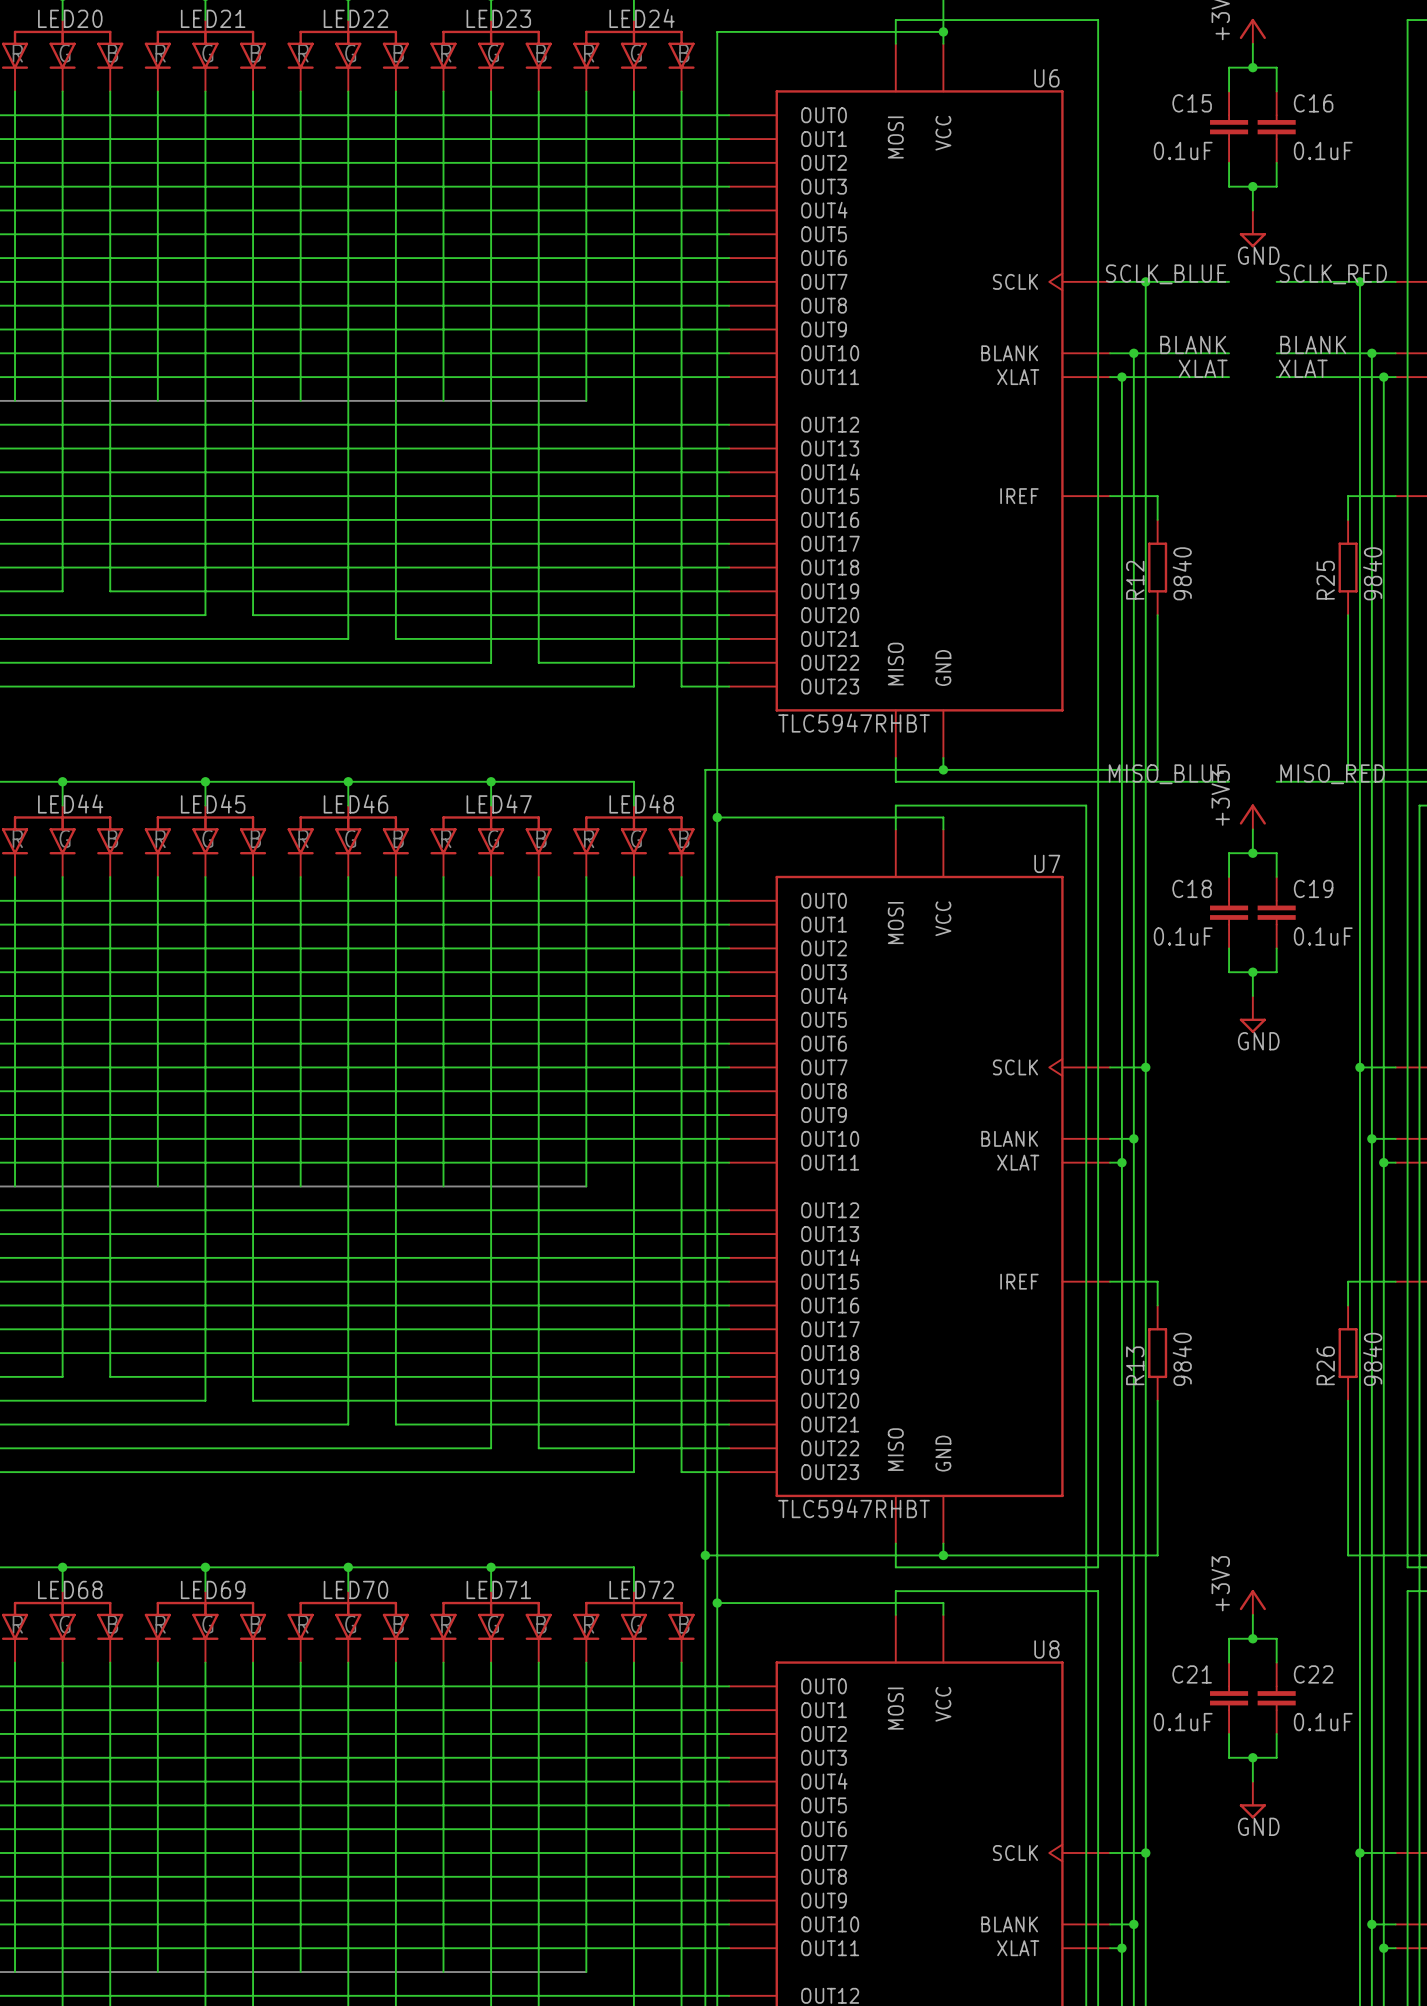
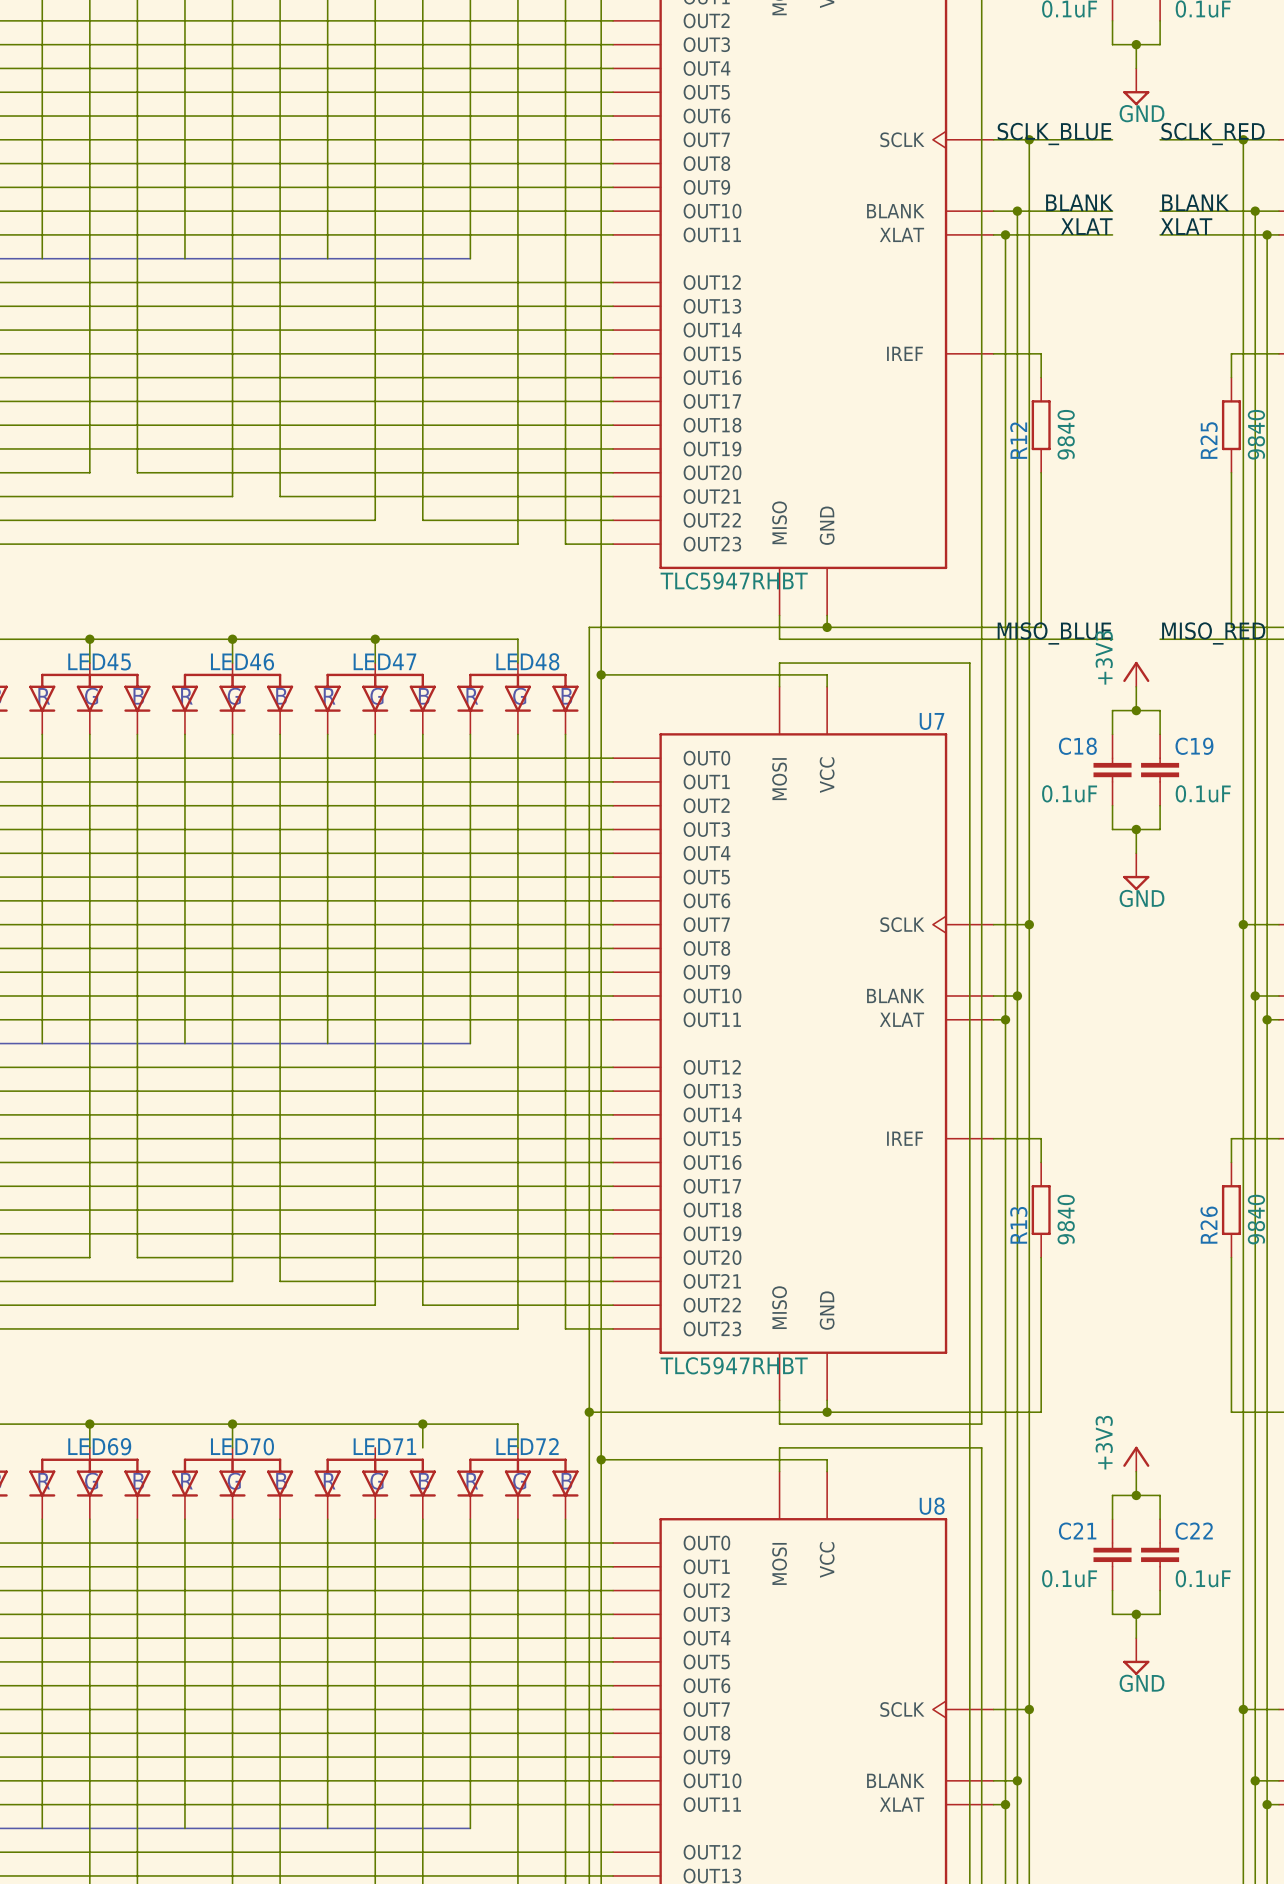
wire: (491, 1567) (491, 1591) -> (422, 1424) (422, 1447)
junction position: (491, 1567) -> (422, 1424)

